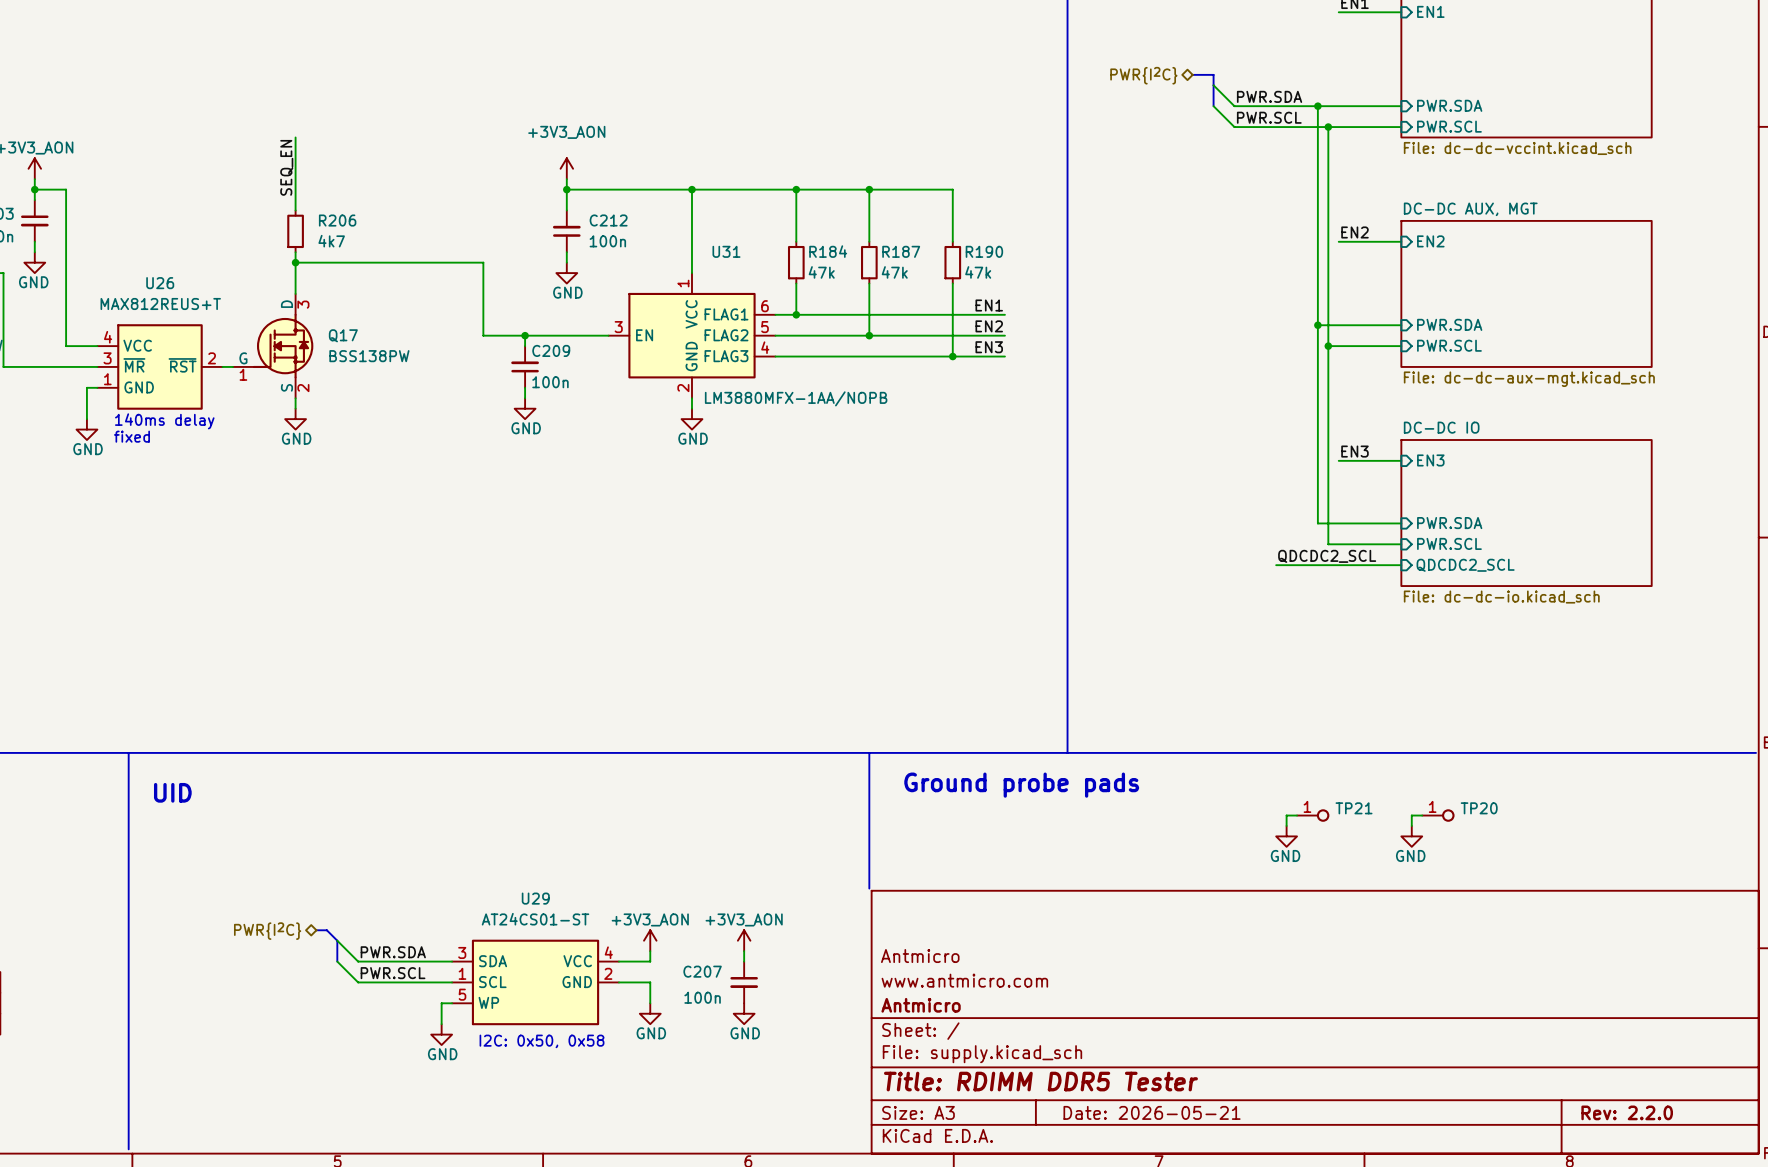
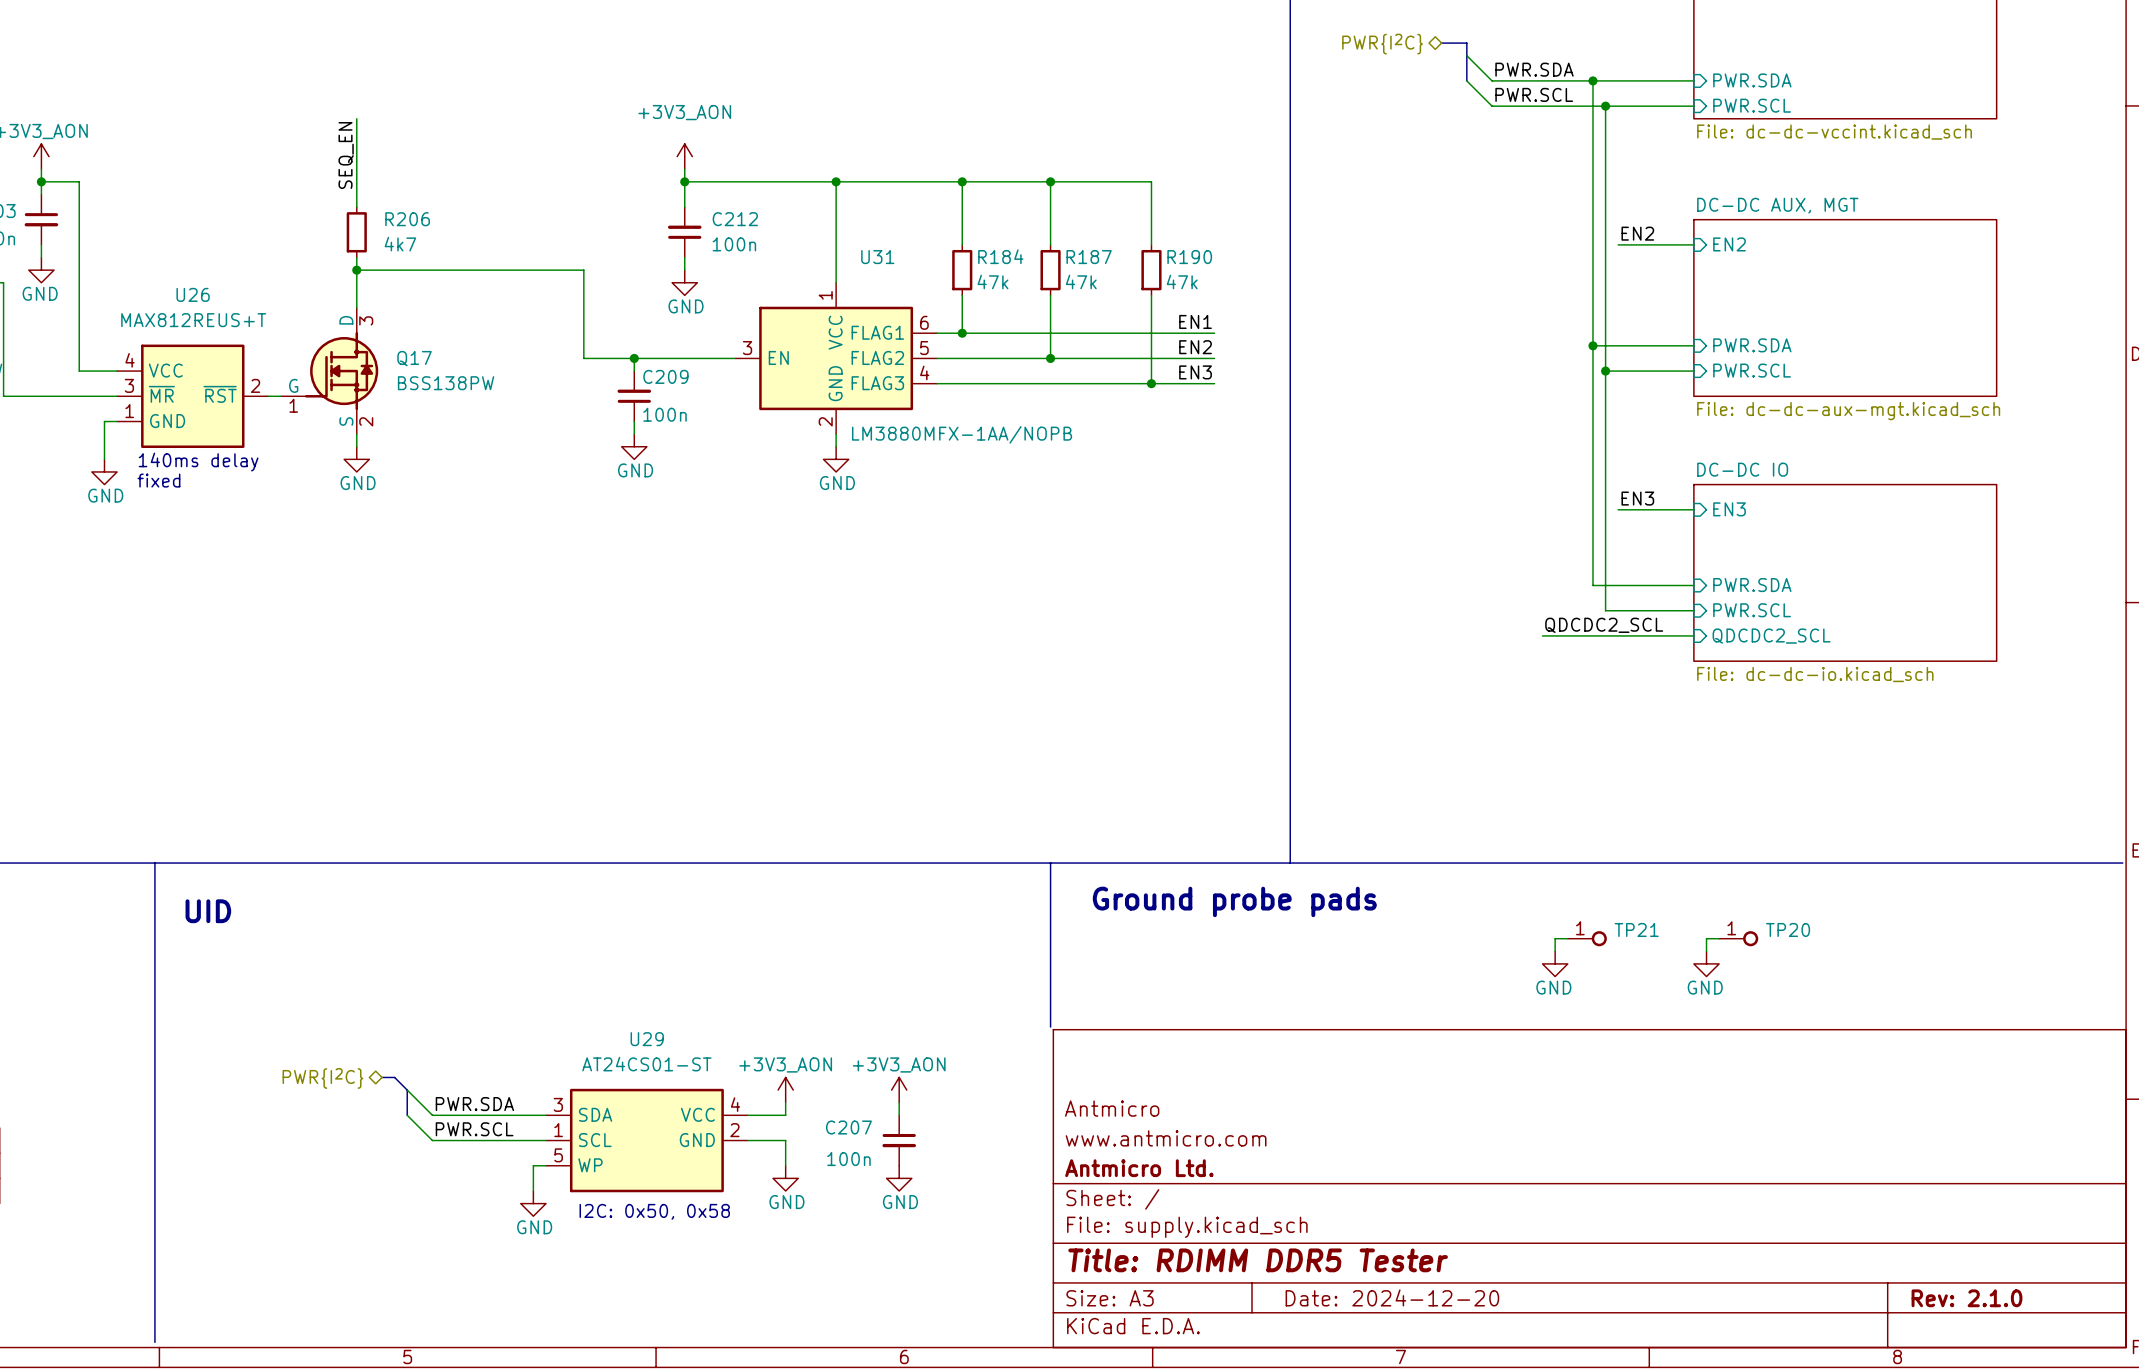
title block: Antmicro (921, 1005) -> Antmicro Ltd. (1139, 1168)
title block: Date: 2026-05-21 (1152, 1112) -> Date: 2024-12-20 (1392, 1297)
title block: Rev: 2.2.0 (1627, 1112) -> Rev: 2.1.0 (1966, 1298)

